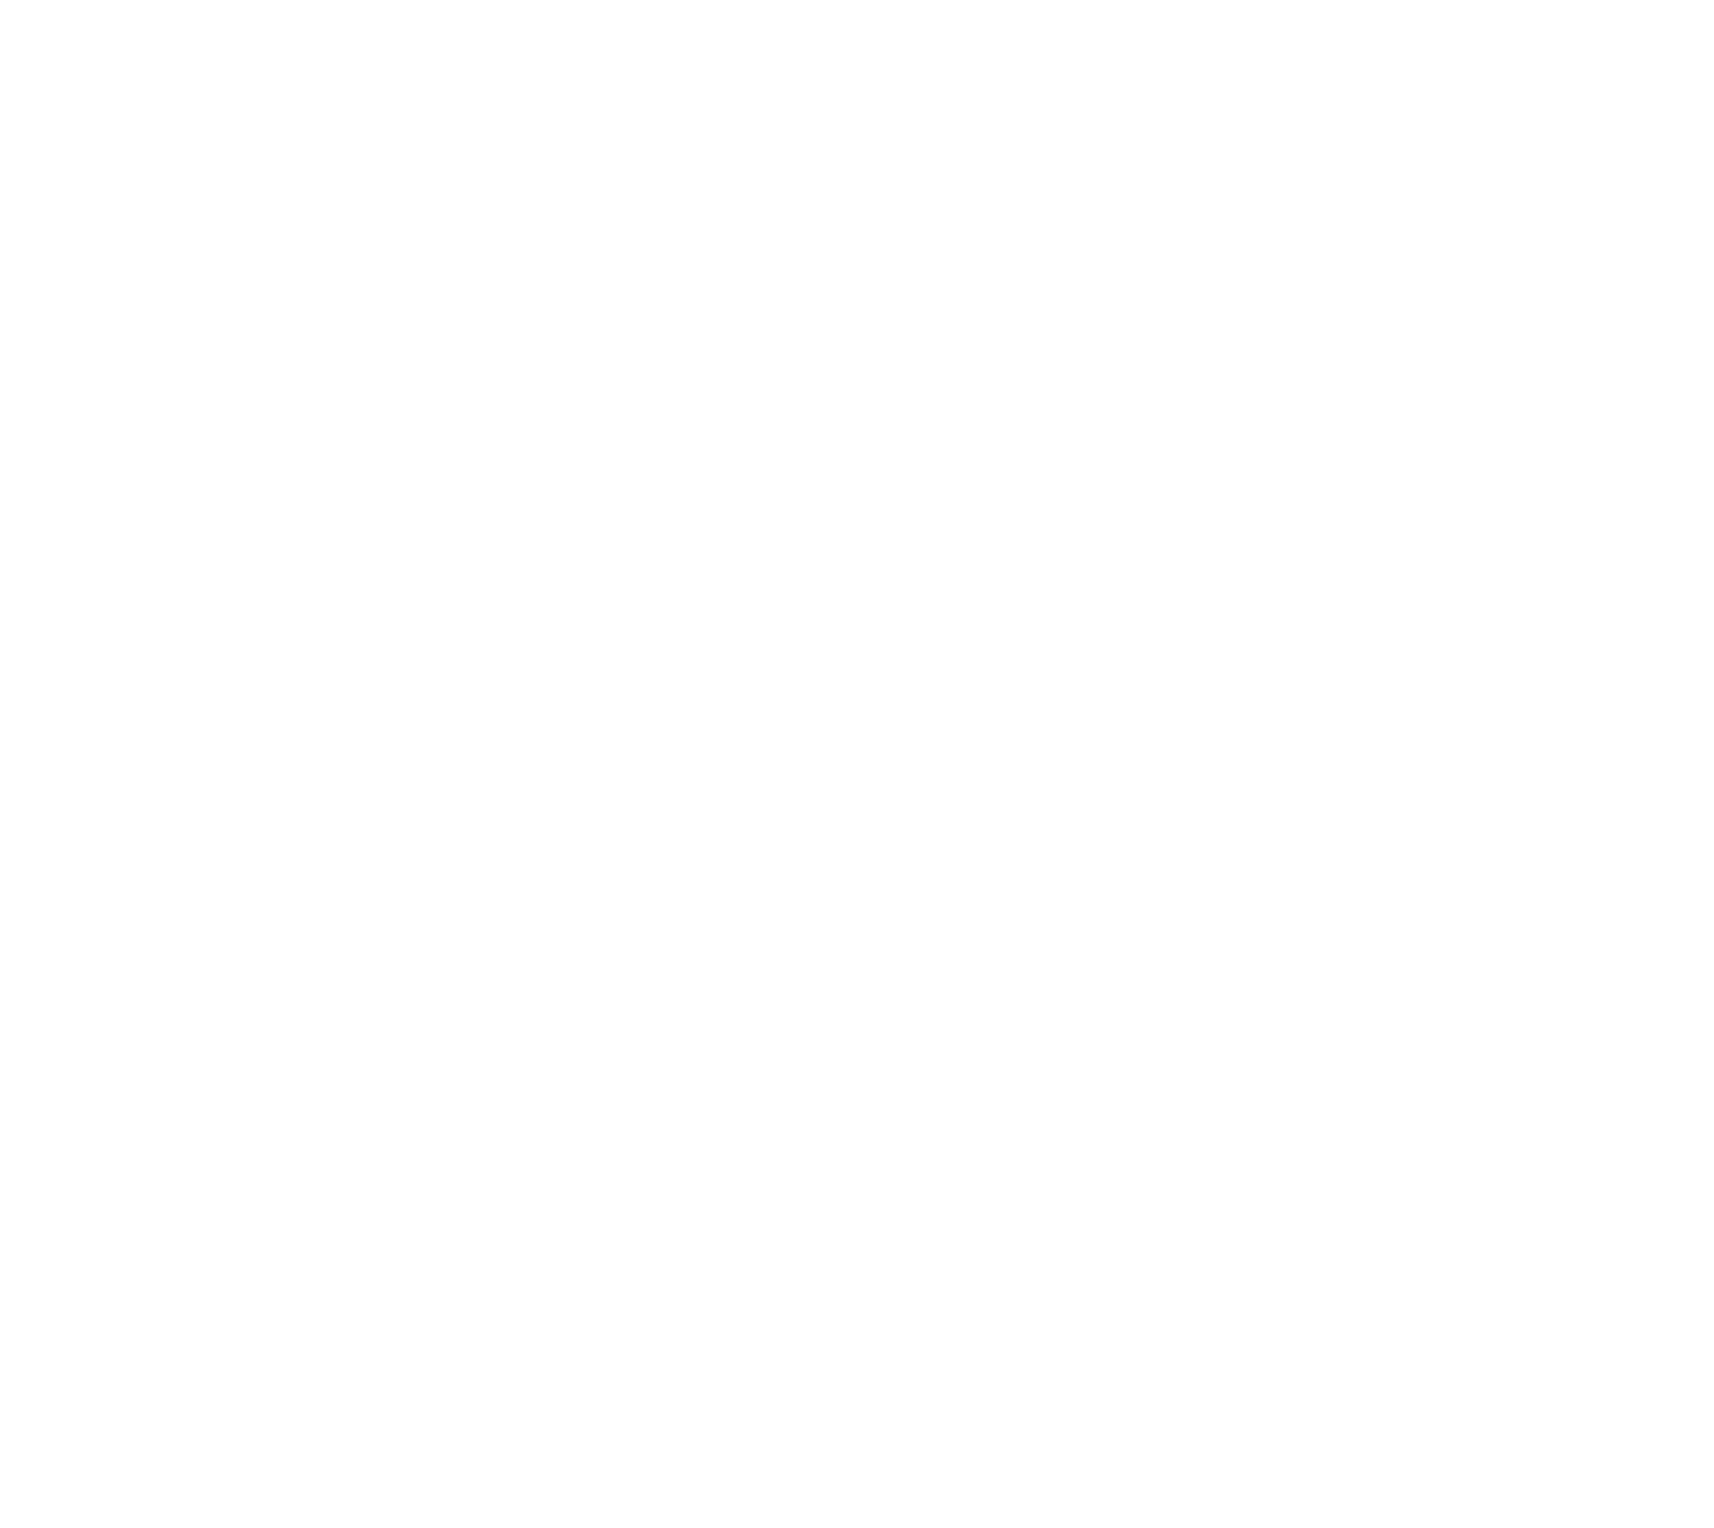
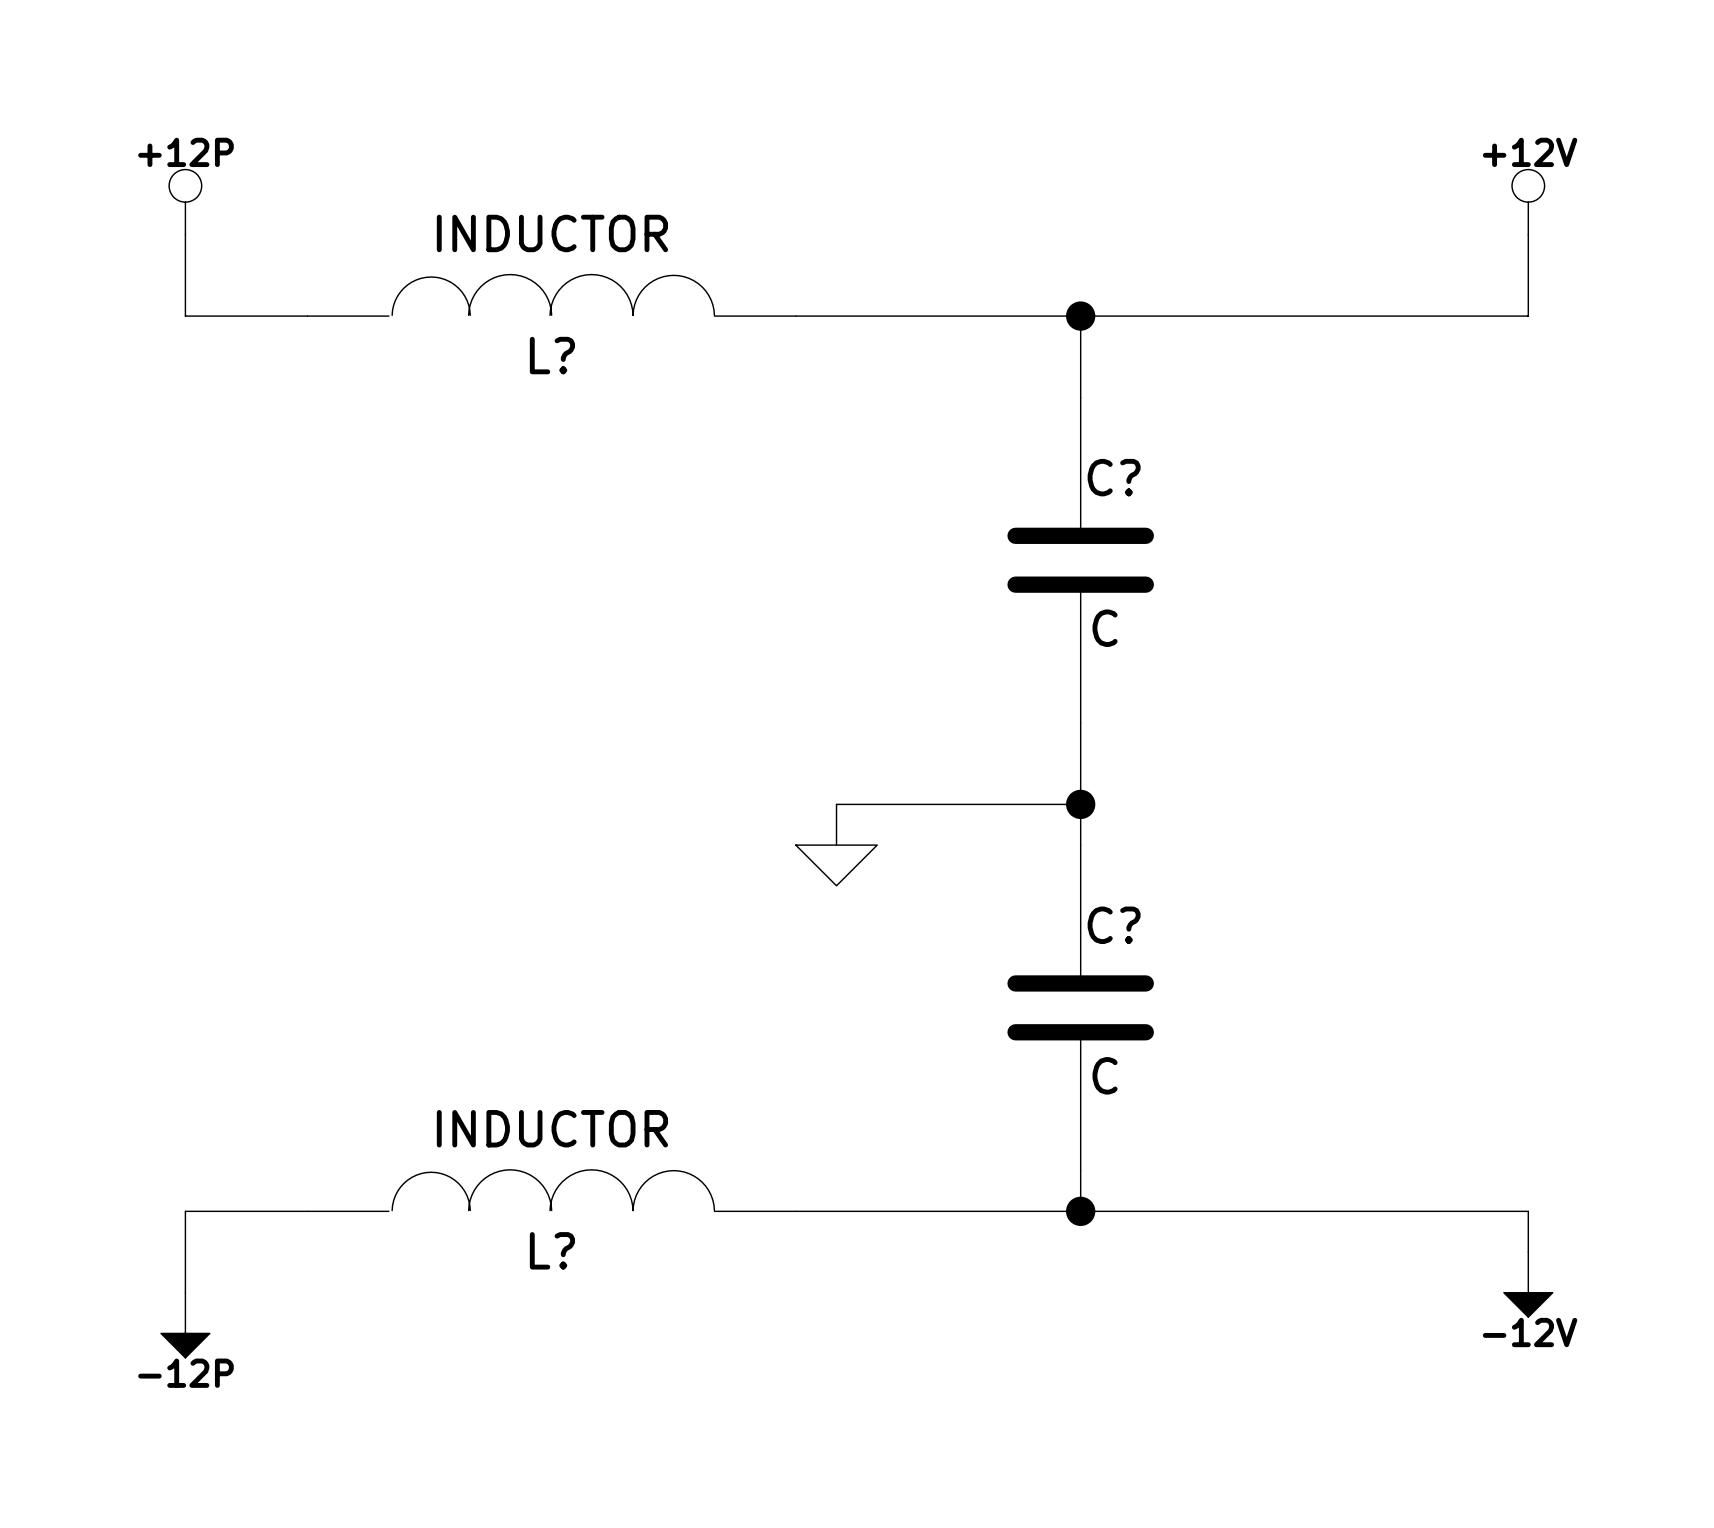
power symbol: none -> +12P (185, 202)
power symbol: none -> +12V (1528, 202)
wire: none -> (185, 234) (185, 316) (307, 316)
wire: none -> (1528, 234) (1528, 316) (795, 316)
L?: none -> INDUCTOR (551, 295)
wire: none -> (1080, 316) (1080, 397)
junction: none -> (1080, 316)
C?: none -> C (1080, 560)
wire: none -> (1080, 723) (1080, 845)
wire: none -> (1080, 804) (836, 804) (836, 845)
junction: none -> (1080, 804)
power symbol: none -> (836, 865)
C?: none -> C (1080, 1007)
wire: none -> (1080, 1170) (1080, 1211)
L?: none -> INDUCTOR (551, 1190)
wire: none -> (307, 1211) (185, 1211) (185, 1292)
wire: none -> (795, 1211) (1528, 1211) (1528, 1252)
junction: none -> (1080, 1211)
power symbol: none -> -12V (1528, 1284)
power symbol: none -> -12P (185, 1325)

